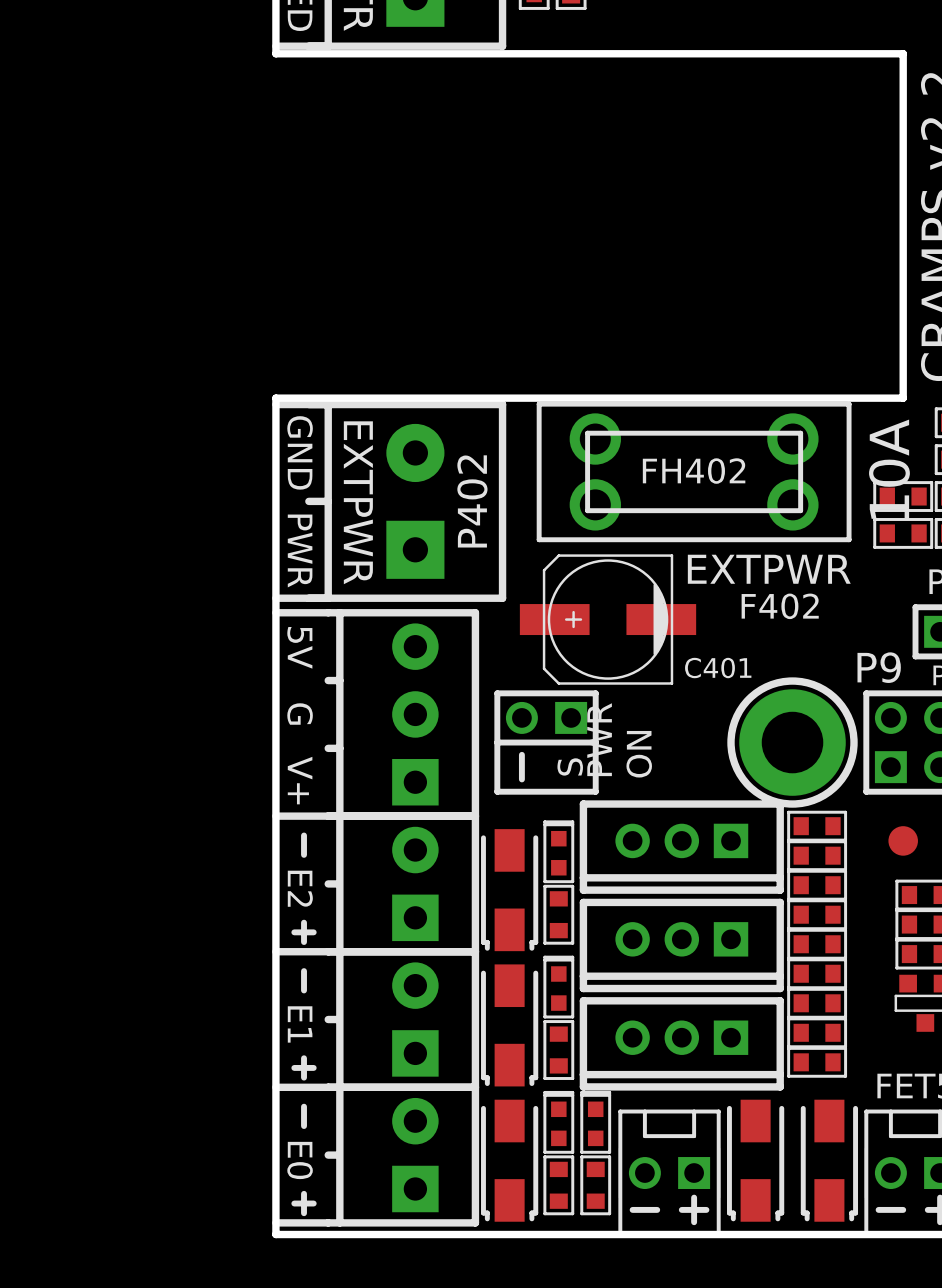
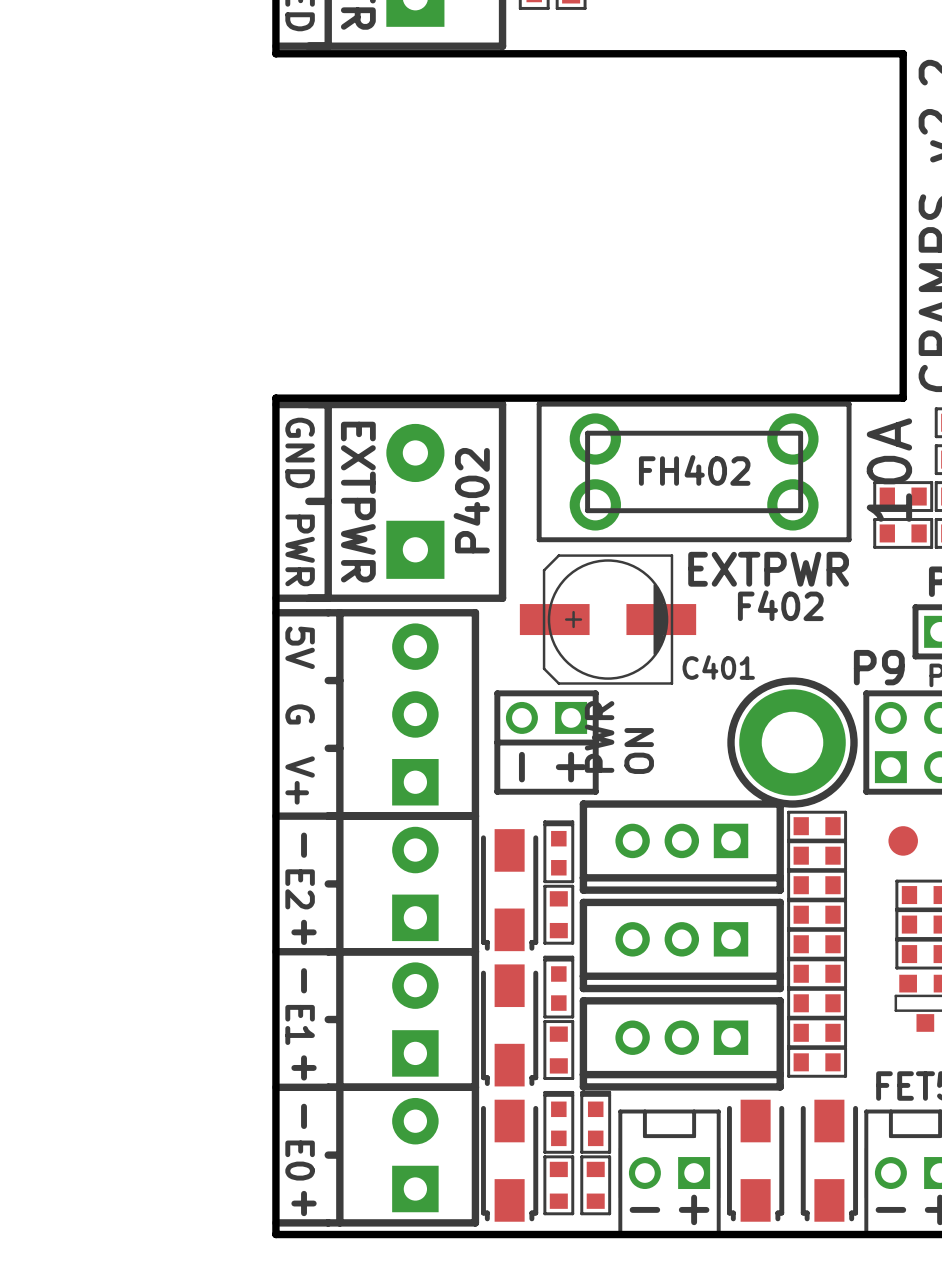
line: none -> (571, 754) (571, 779)
text: S (570, 766) -> none
line: none -> (558, 767) (583, 767)

